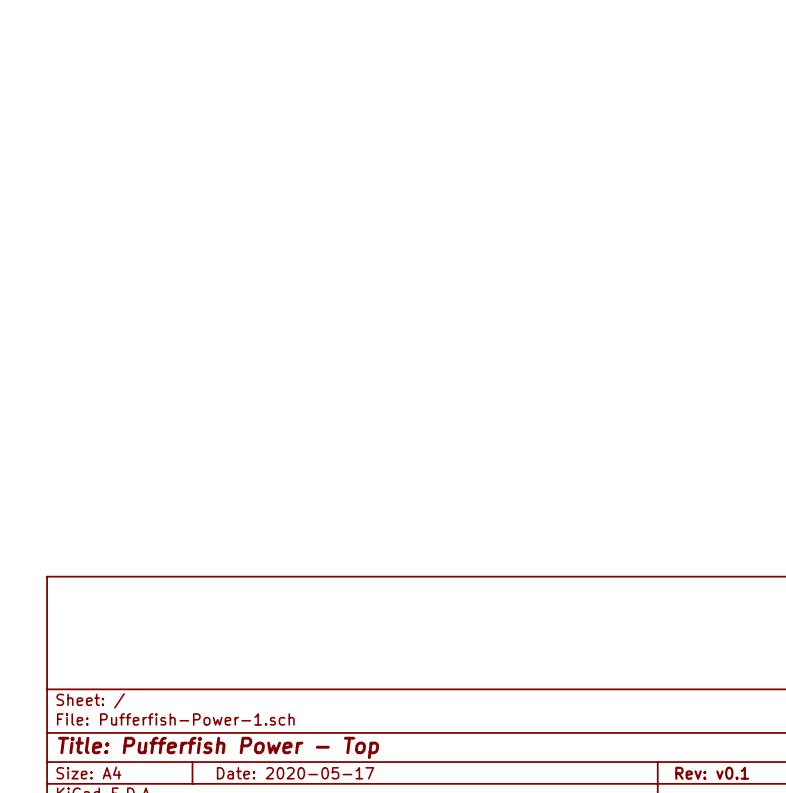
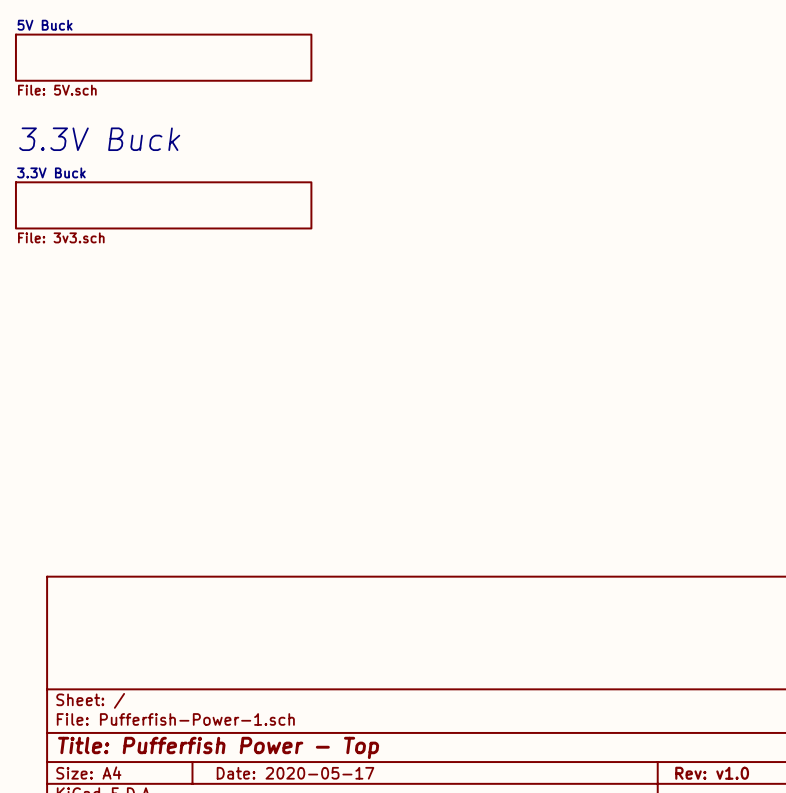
sheet 5V Buck: none -> File: 5V.sch (163, 57)
text: none -> 3.3V Buck (99, 139)
sheet 3.3V Buck: none -> File: 3v3.sch (163, 205)
title block: Rev: v0.1 (712, 773) -> Rev: v1.0 (712, 773)

